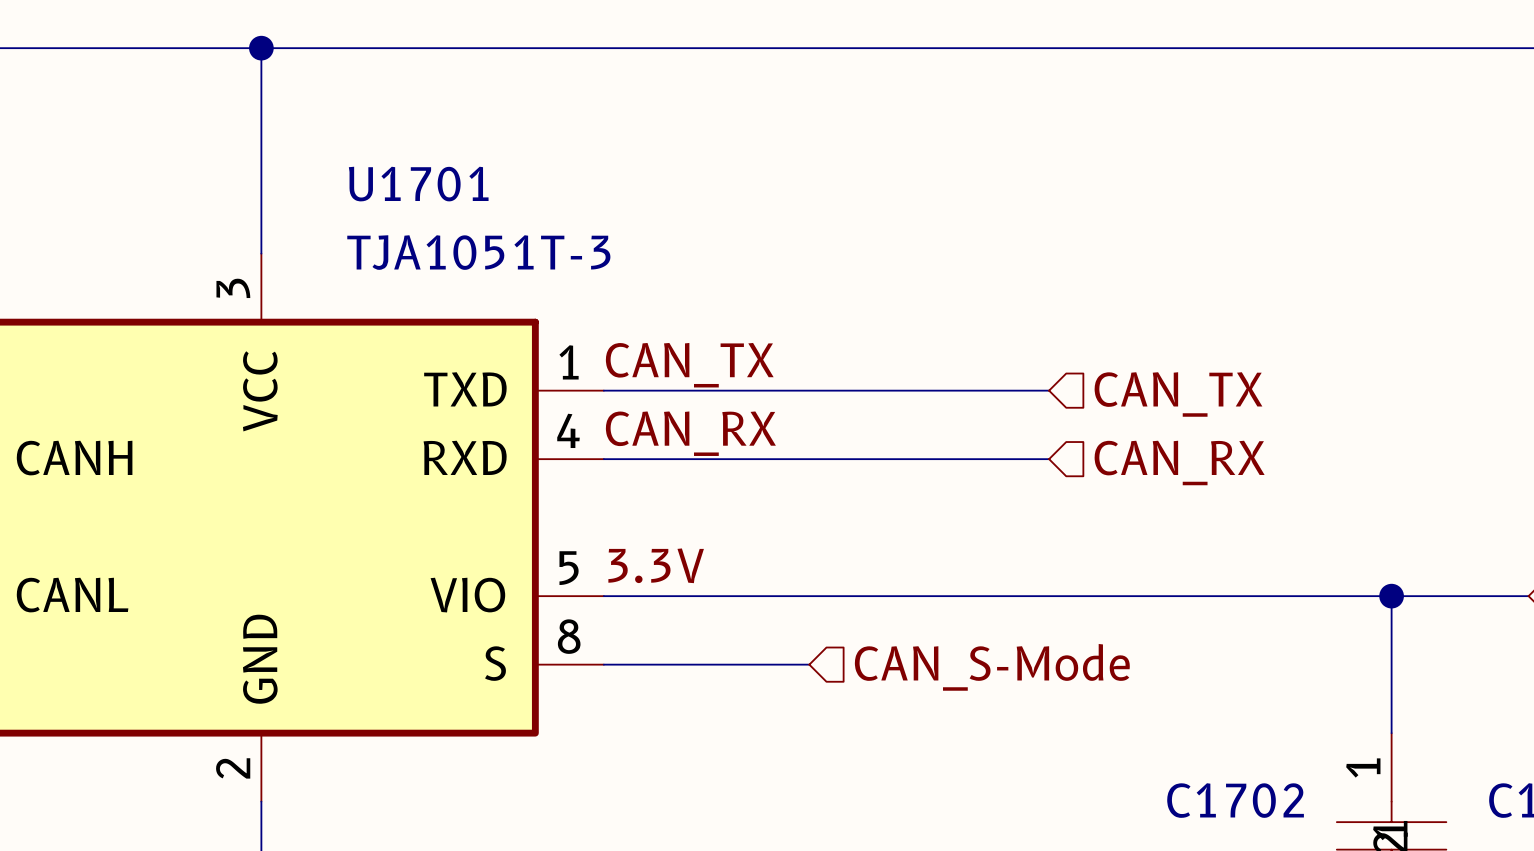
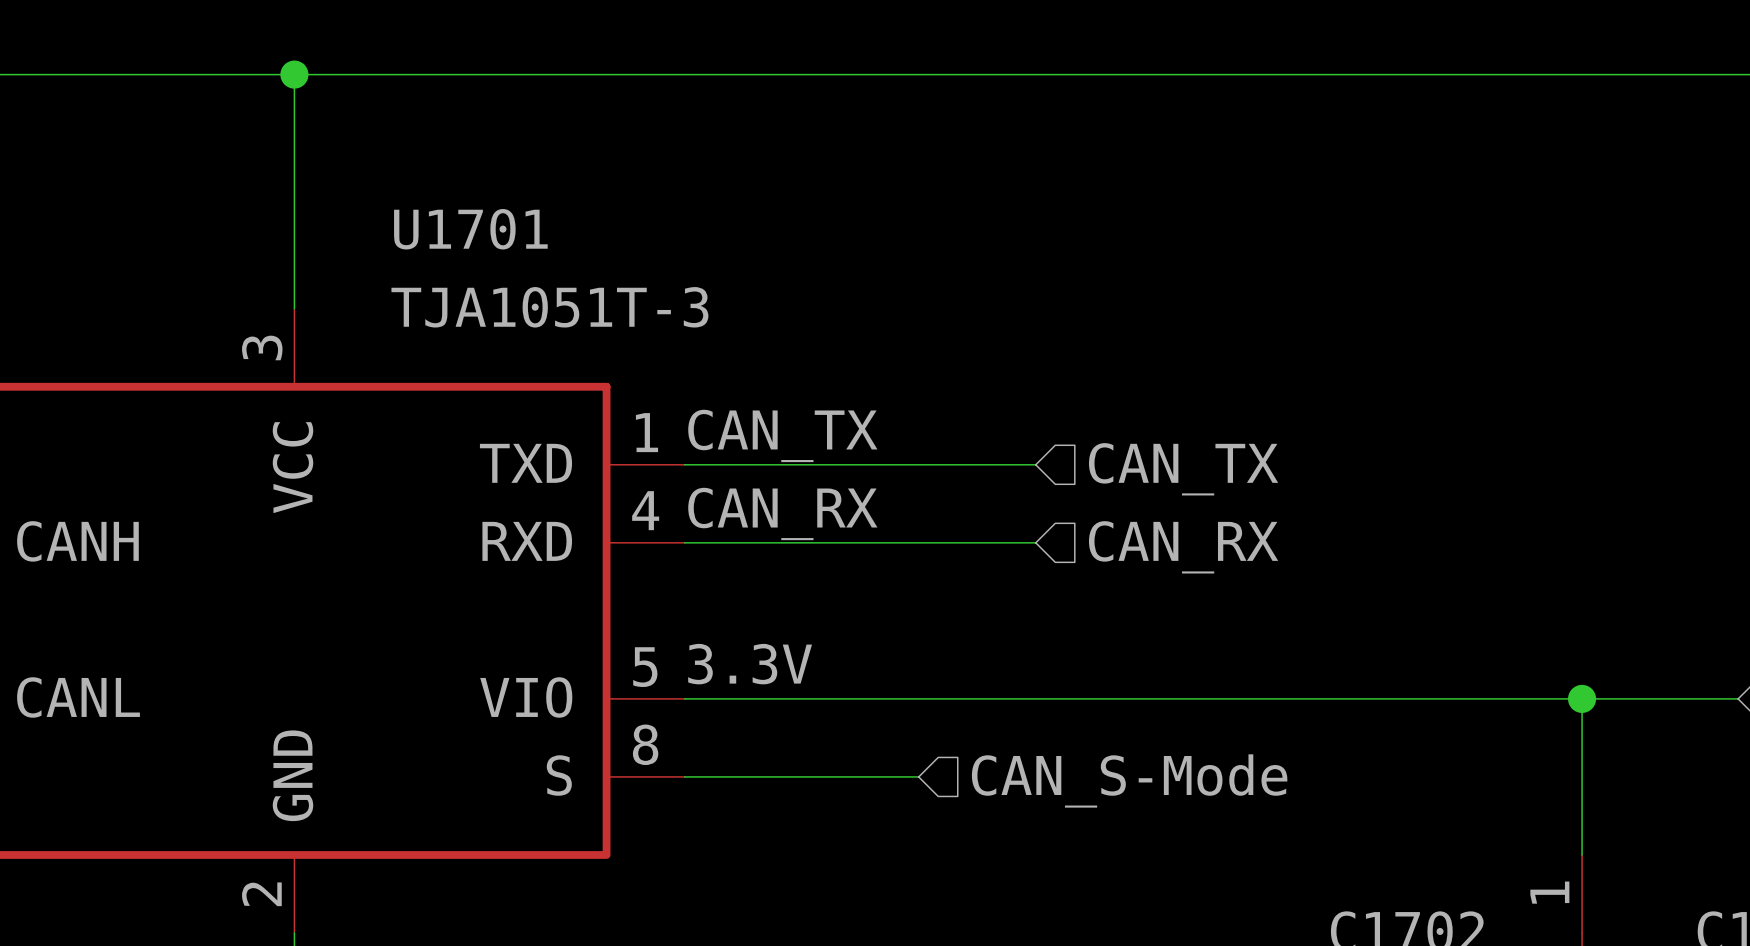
wire: (912, 390) (1049, 390) -> none
hierarchical label position: CAN_TX (1178, 394) -> CAN_TX (1183, 469)
wire: (912, 459) (1049, 459) -> none
hierarchical label position: CAN_RX (1179, 462) -> CAN_RX (1183, 547)

